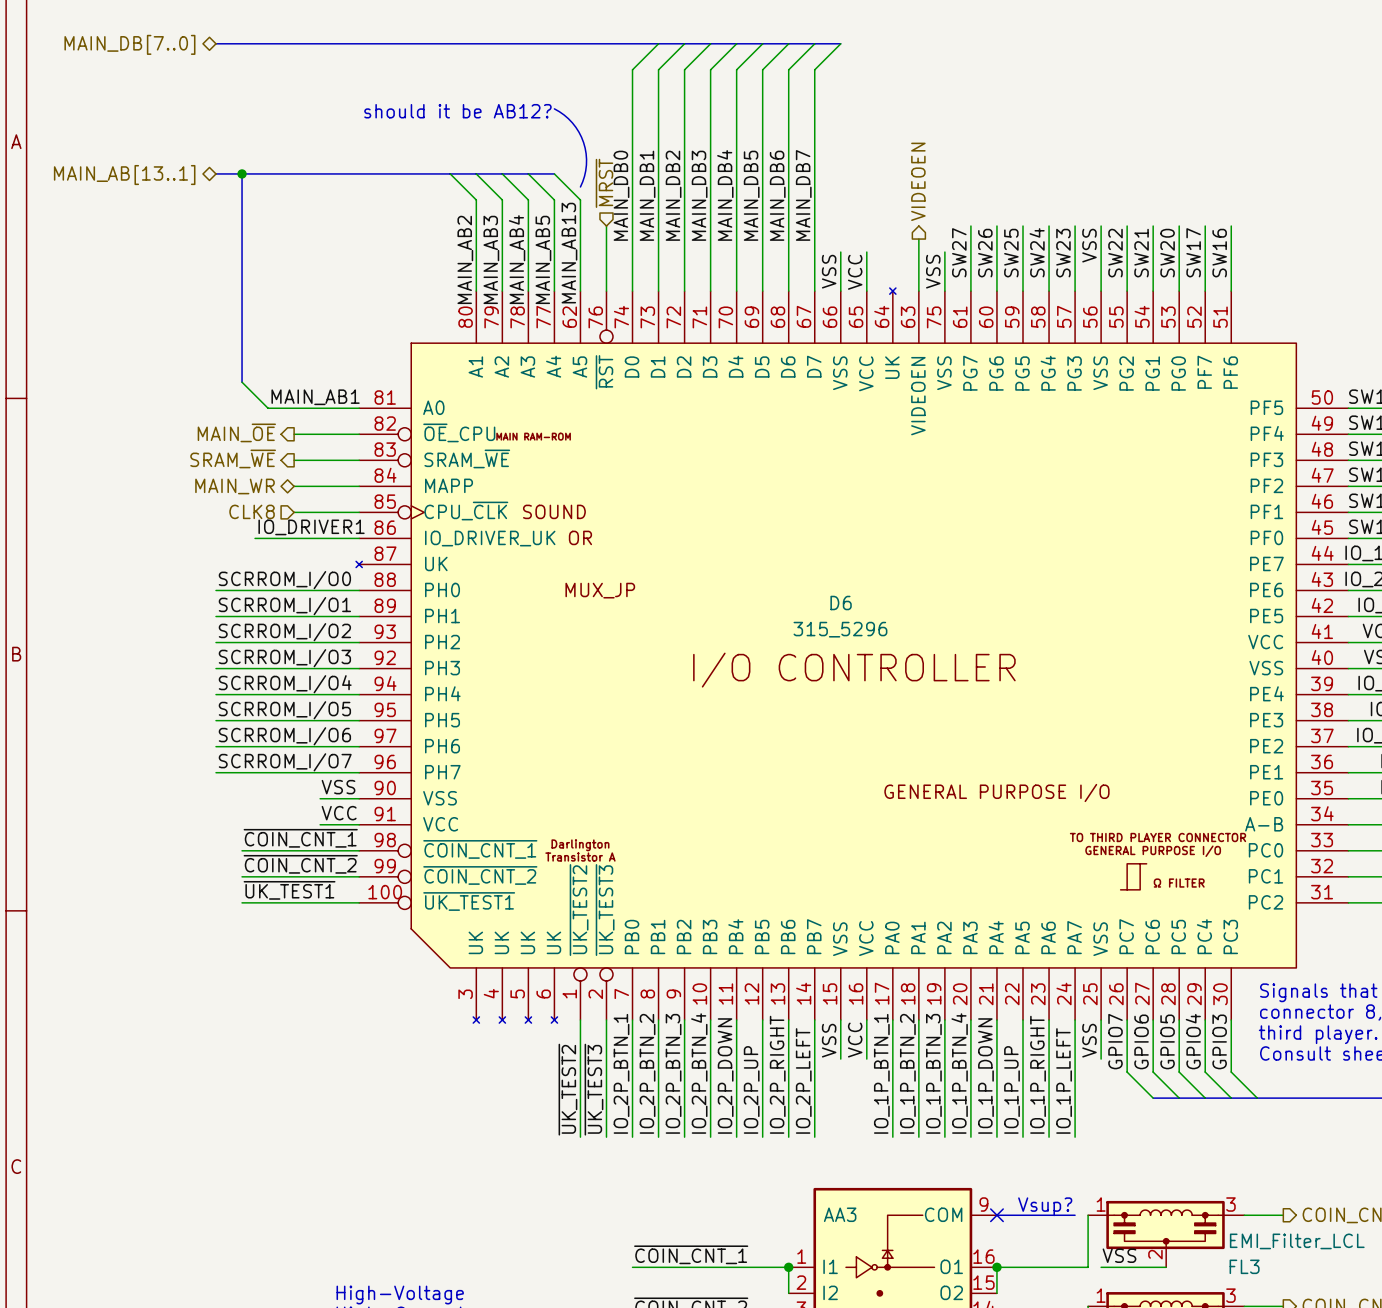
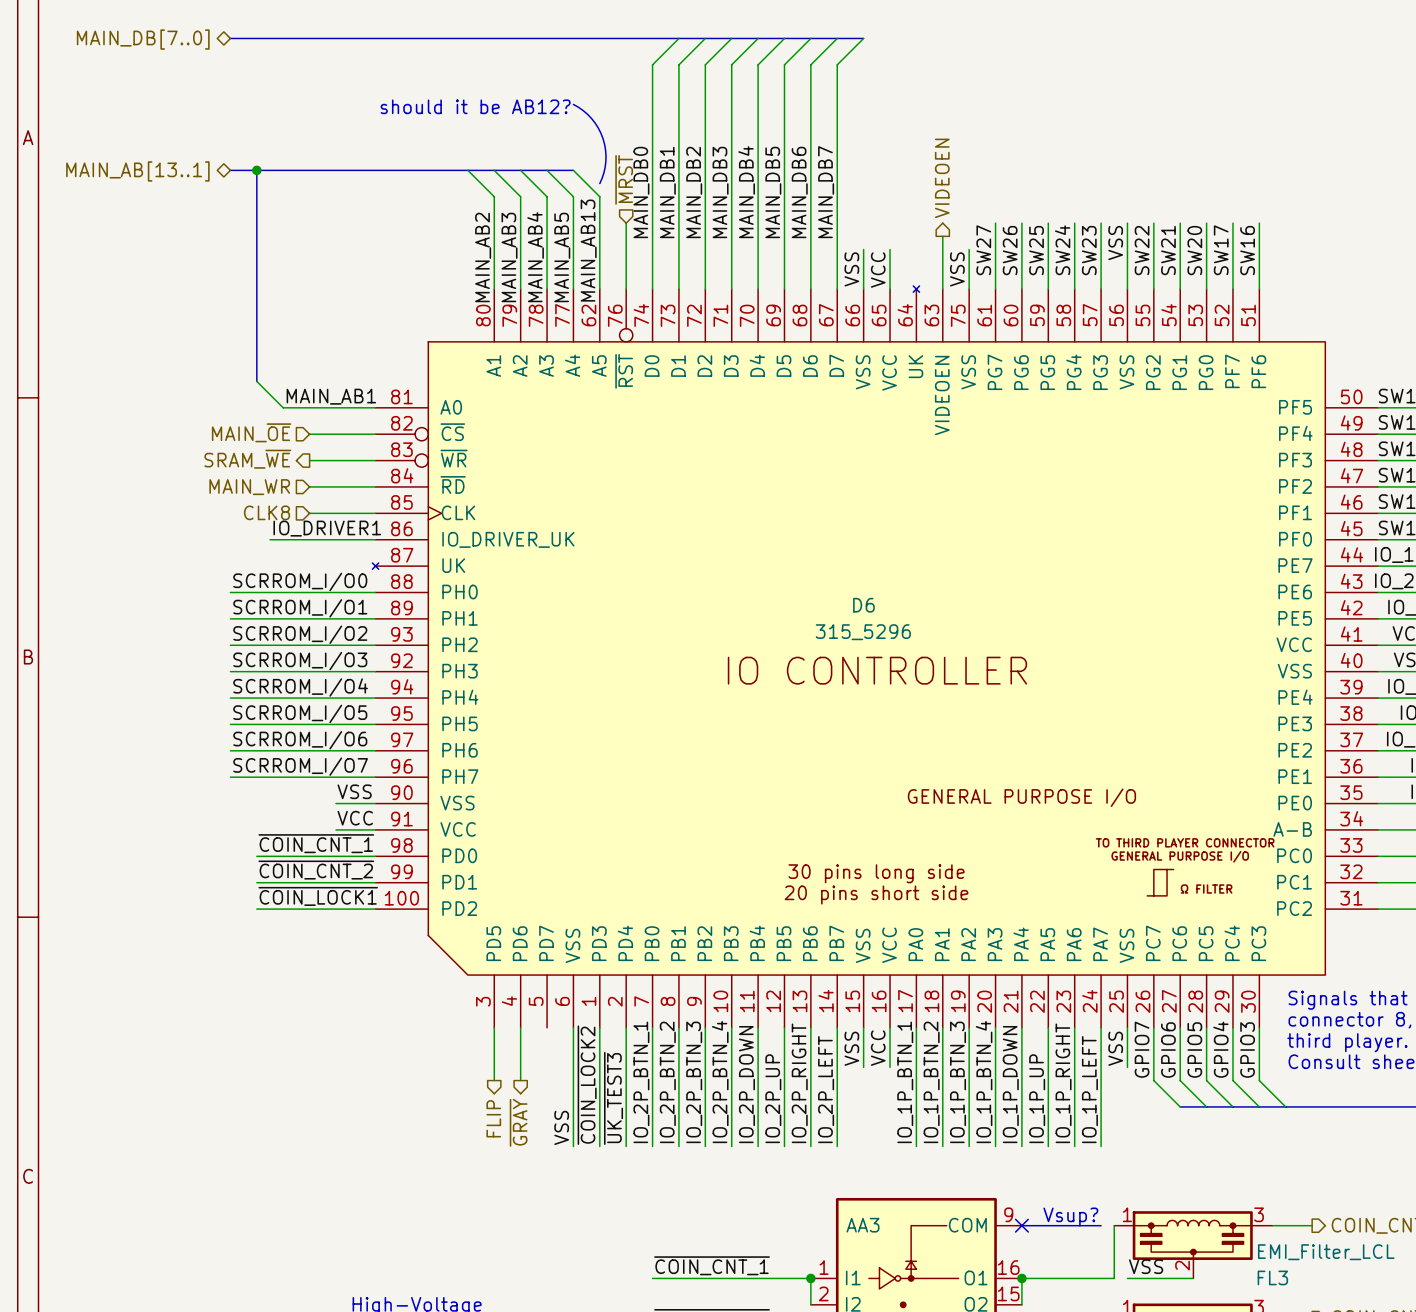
D6 symbol: [356, 288, 1349, 1024] -> [372, 285, 1379, 1028]
hierarchical label shape: output (236, 432) -> input (251, 432)
hierarchical label shape: bidirectional (235, 486) -> input (249, 487)
label: ~{UK_TEST1} (289, 890) -> ~{COIN_LOCK1} (318, 896)
wire: none -> (494, 1027) (494, 1080)
wire: none -> (520, 1027) (520, 1080)
wire: none -> (573, 1027) (573, 1146)
label: ~{UK_TEST2} (567, 1089) -> ~{COIN_LOCK2} (587, 1085)
hierarchical label: none -> FLIP (493, 1118)
hierarchical label: none -> ~{GRAY} (518, 1122)
label: none -> VSS (561, 1127)

